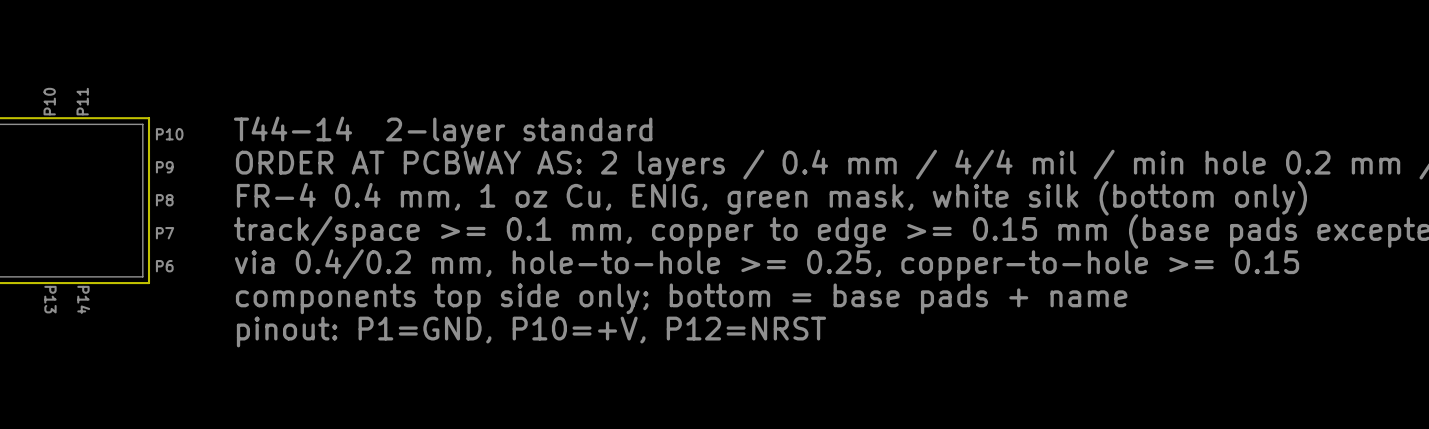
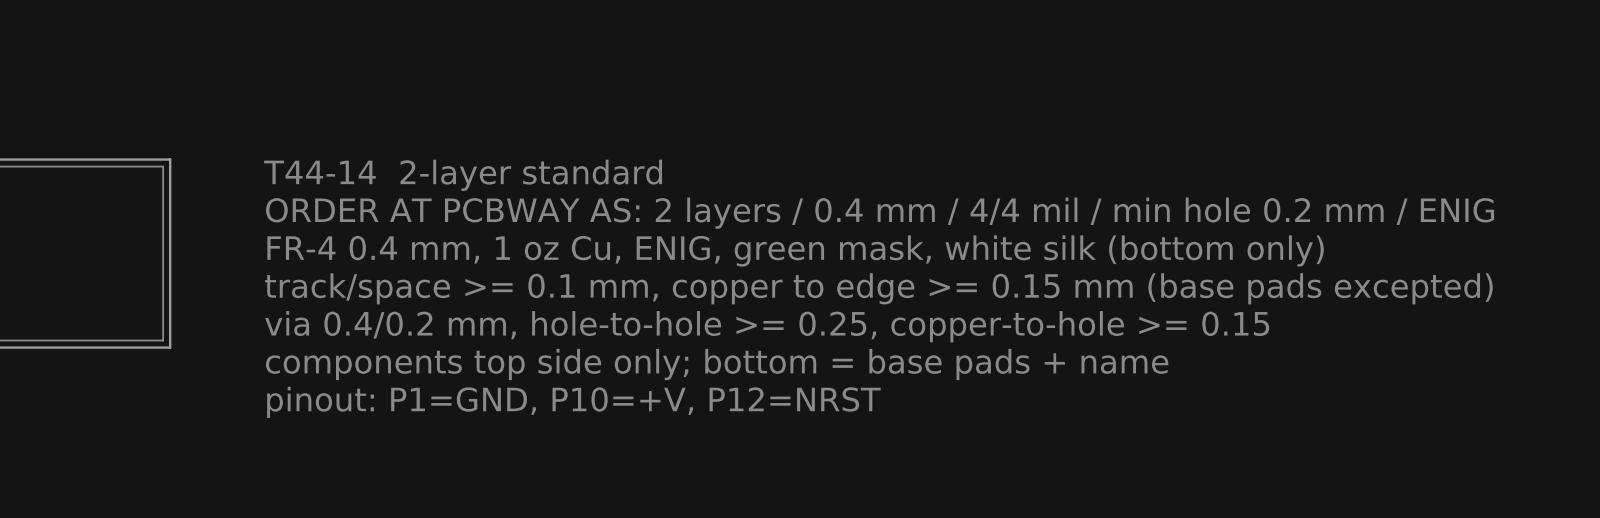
text: P10 (49, 101) -> none
text: P11 (82, 101) -> none
text: P10 (169, 134) -> none
text: P9 (164, 167) -> none
text: P8 (164, 200) -> none
text: P7 (165, 233) -> none
text: P6 (164, 266) -> none
text: P13 (50, 299) -> none
text: P14 (83, 299) -> none

